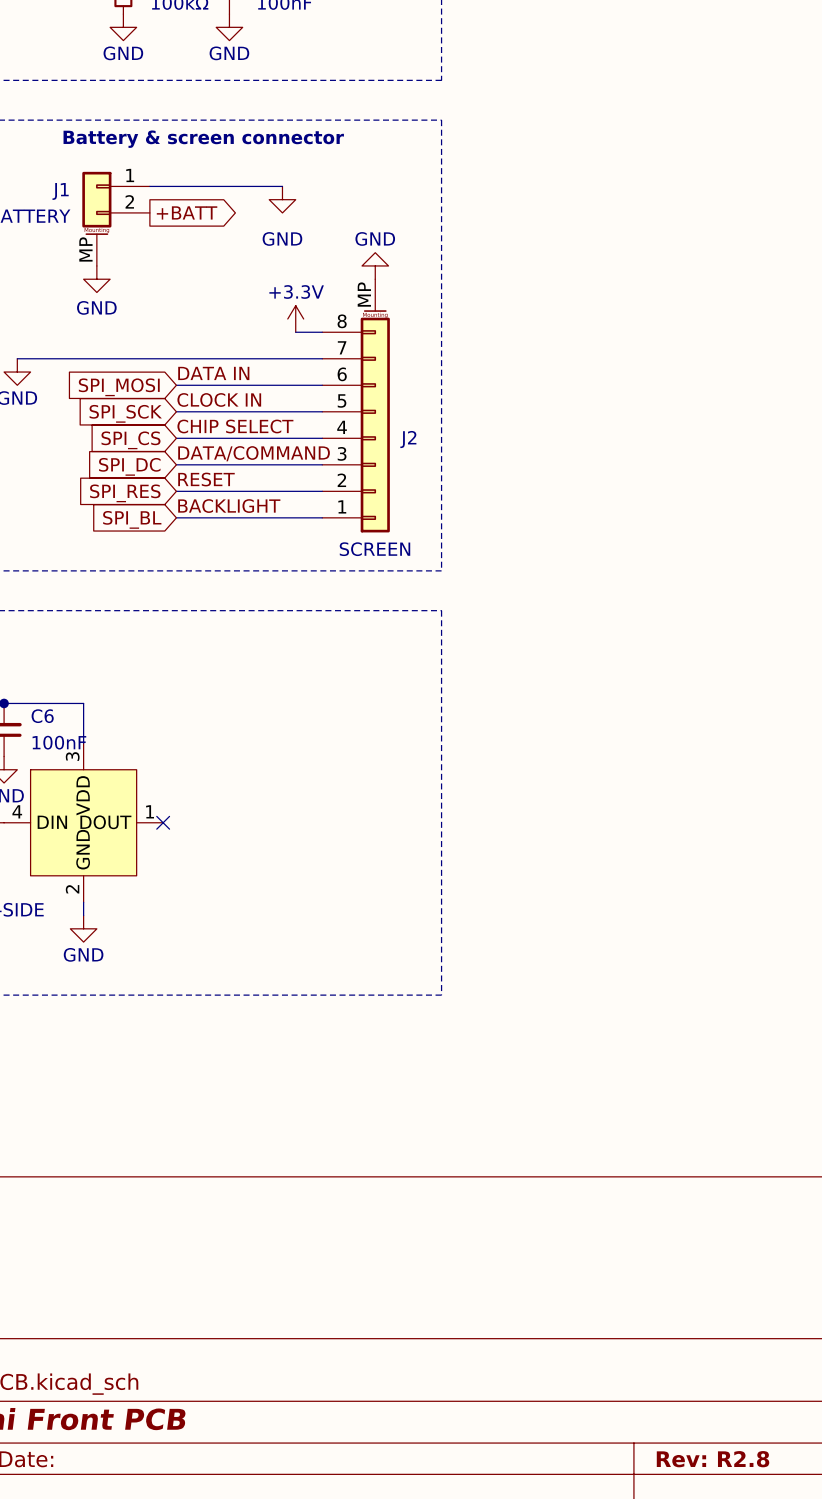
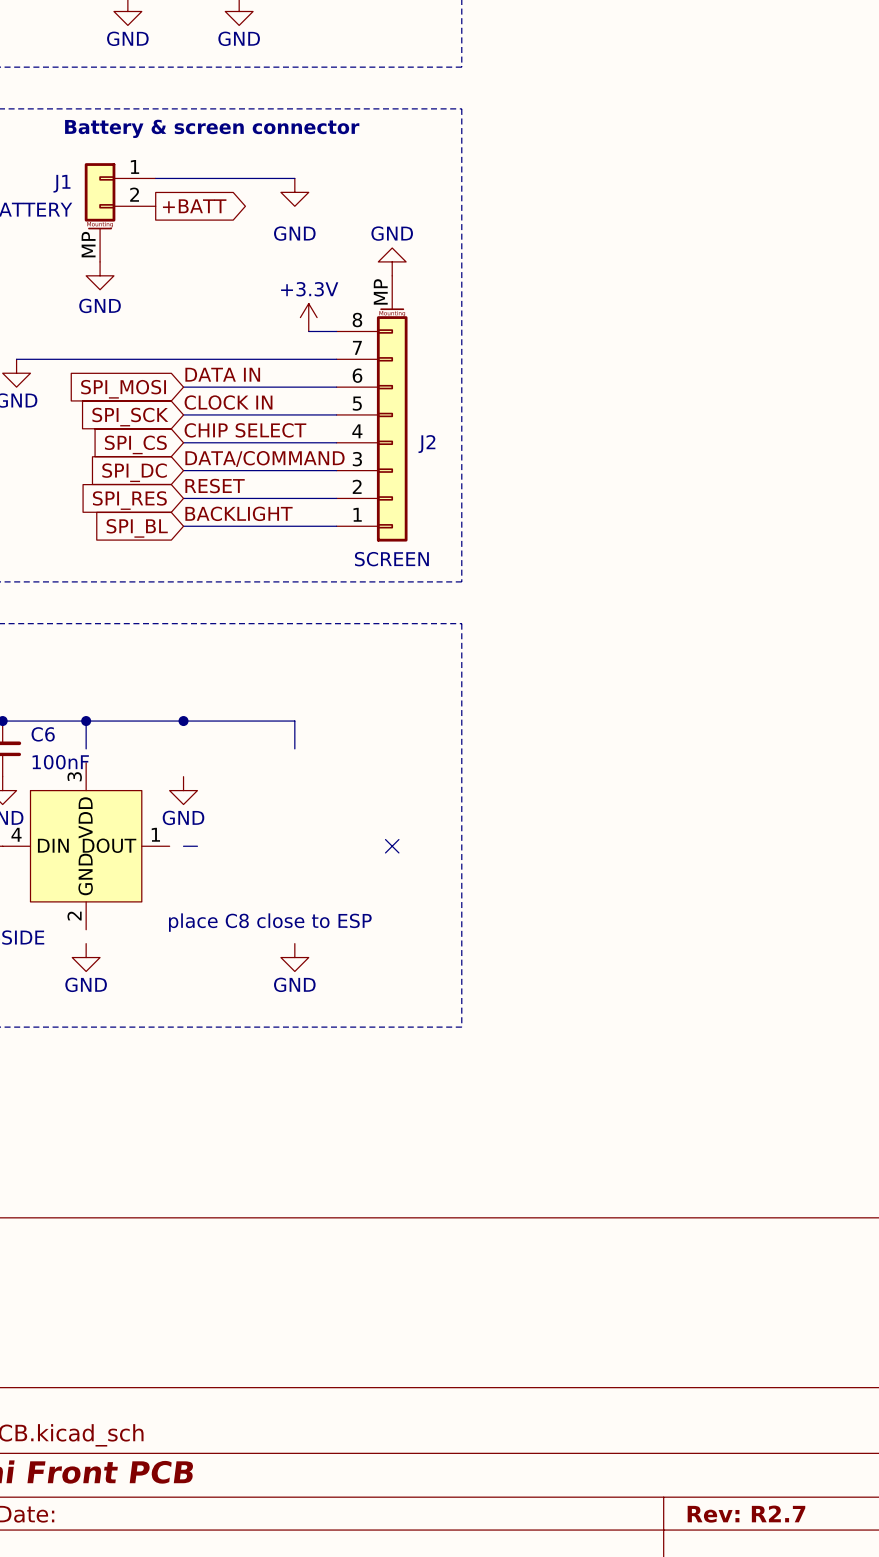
wire: none -> (86, 721) (294, 721) (294, 748)
junction: none -> (86, 721)
junction: none -> (183, 721)
wire: (83, 729) (83, 743) -> none
power symbol: none -> GND (183, 790)
no-connect mark: (163, 822) -> none
wire: none -> (183, 846) (197, 846)
no-connect mark: none -> (392, 846)
text: none -> place C8 close to ESP (270, 922)
wire: (83, 902) (83, 915) -> none
power symbol: none -> GND (294, 957)
title block: Rev: R2.8 (713, 1459) -> Rev: R2.7 (746, 1514)

